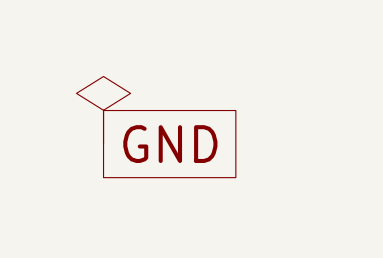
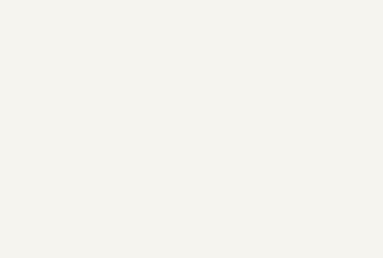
power symbol: (103, 110) -> none
global label: GND (170, 144) -> none

